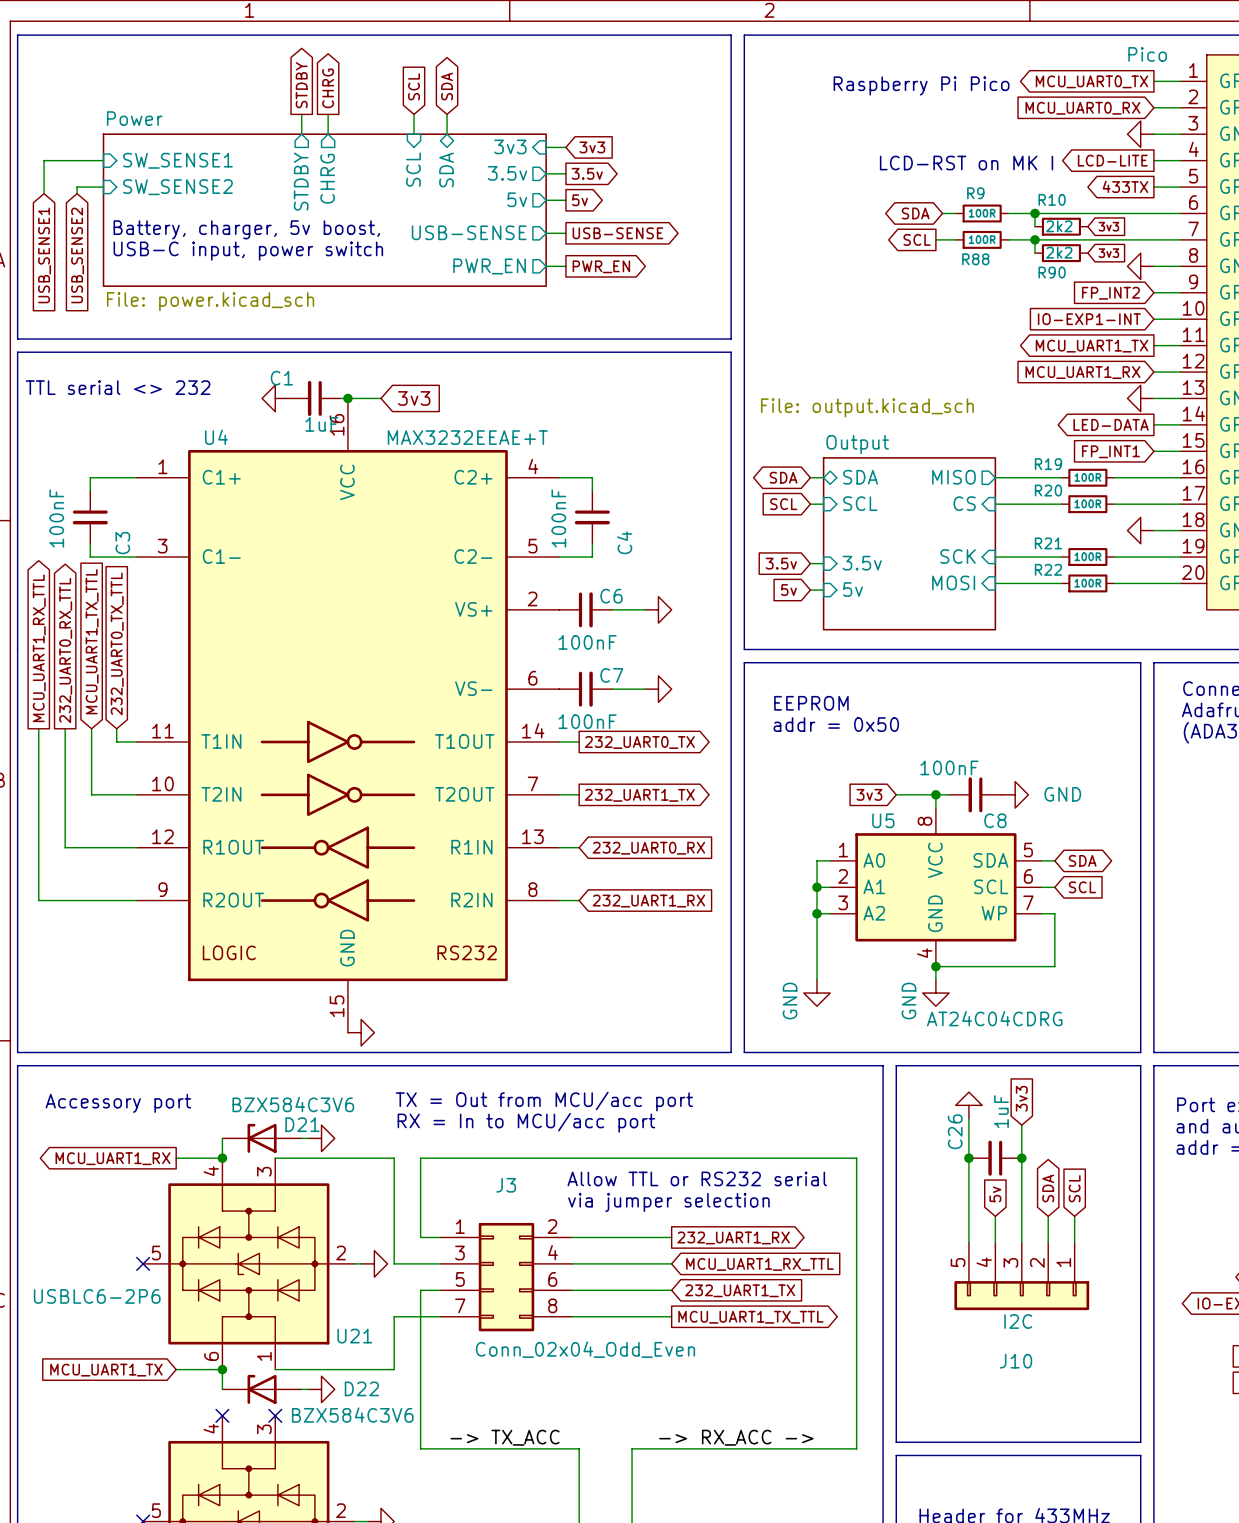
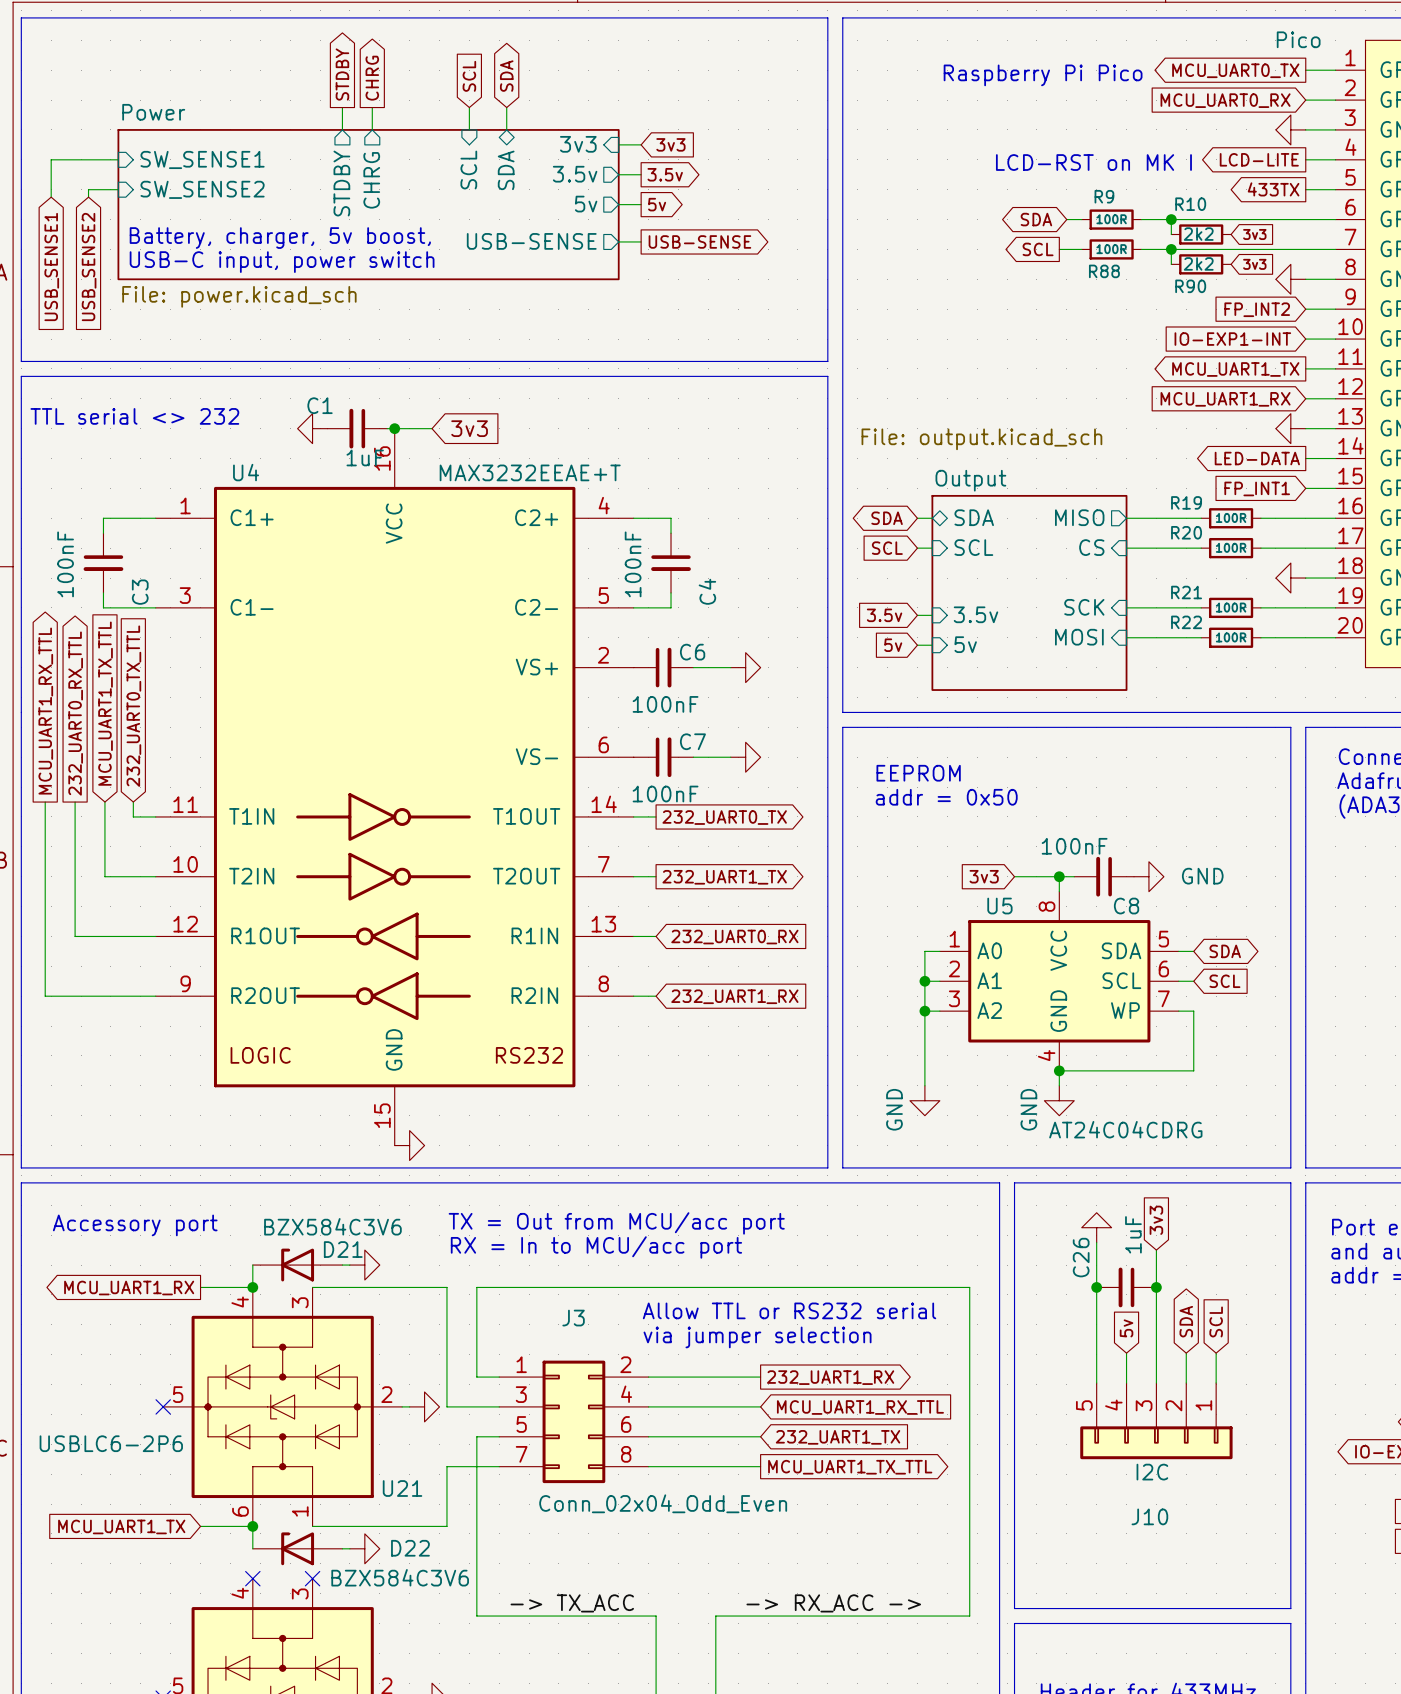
sheet Power shape: [102, 133, 547, 287] -> [117, 129, 620, 281]
sheet pin: PWR_EN (489, 266) -> none
wire: (546, 266) (565, 266) -> none
global label: PWR_EN (601, 266) -> none

